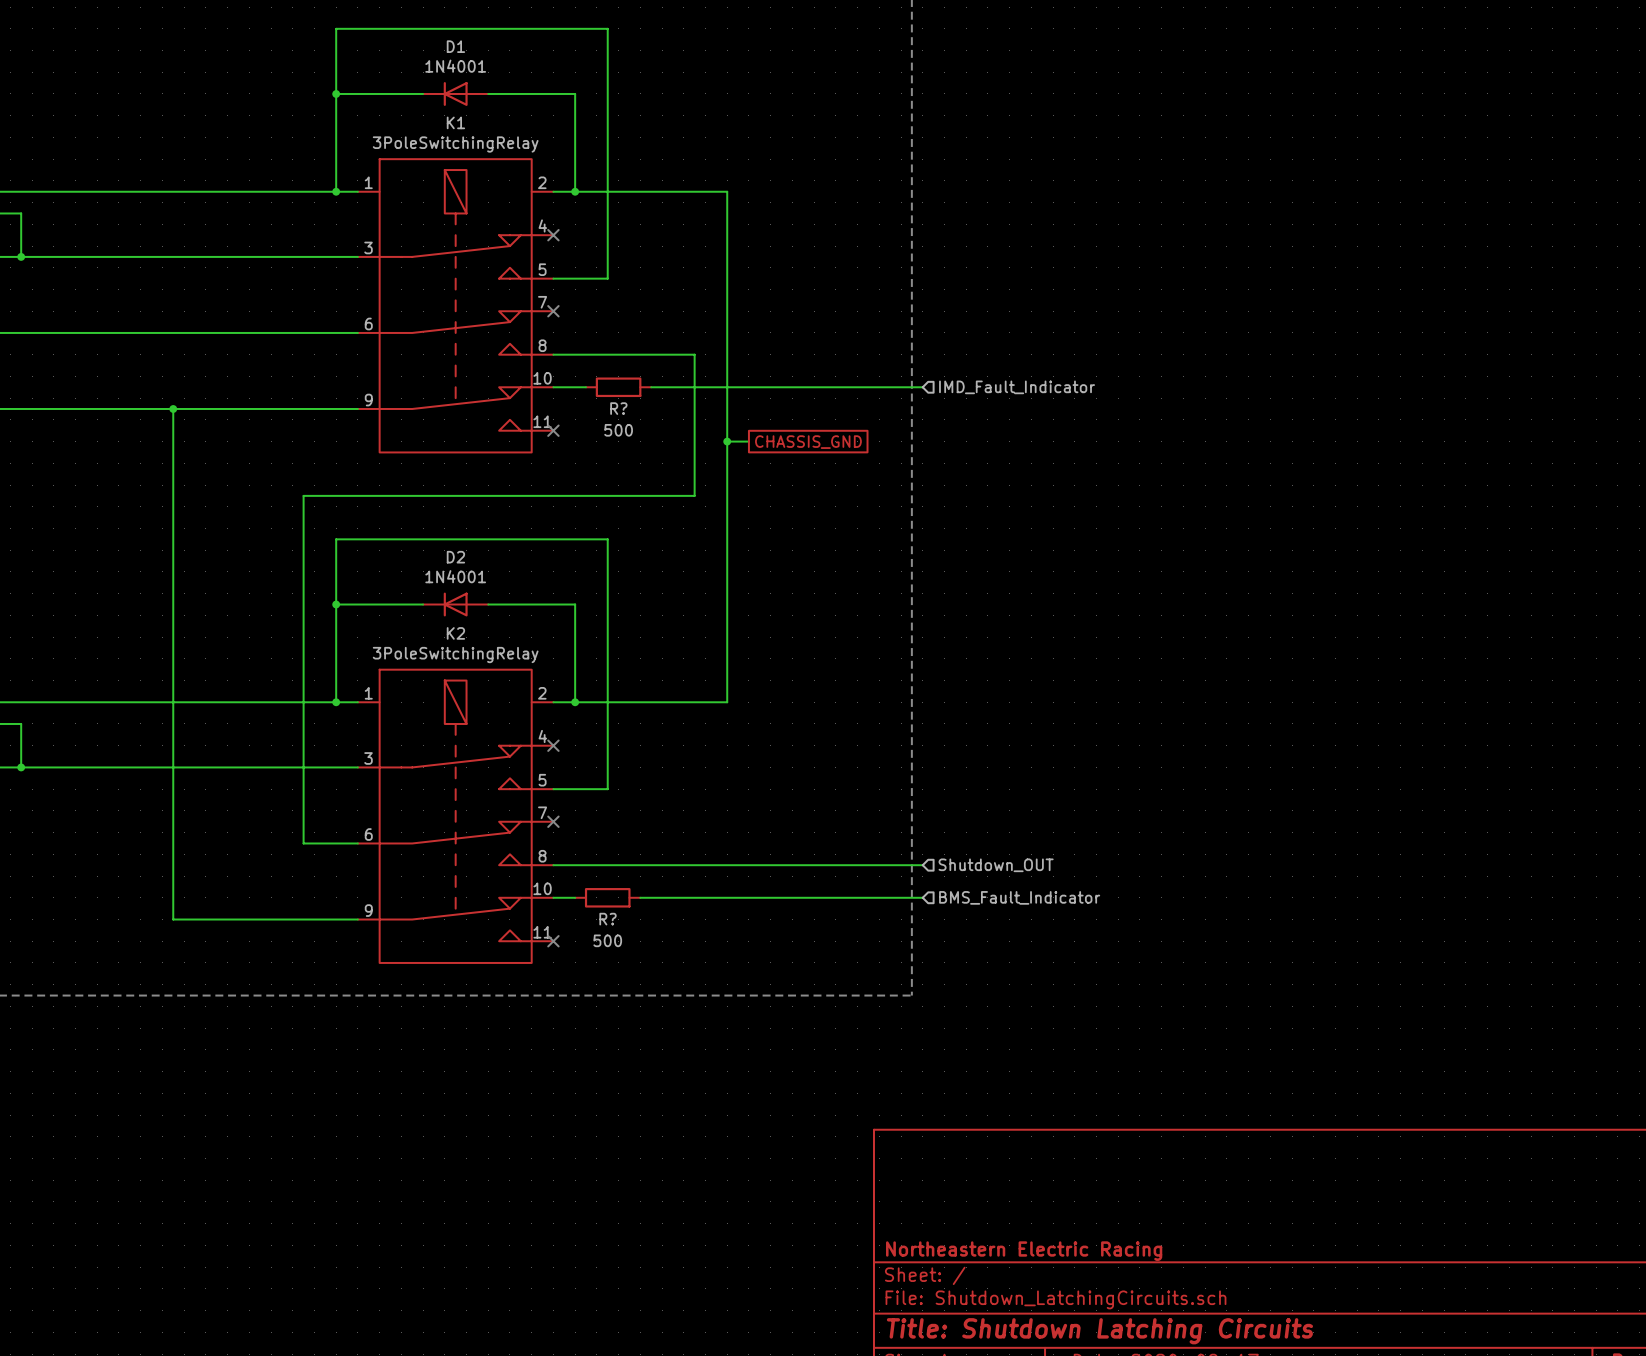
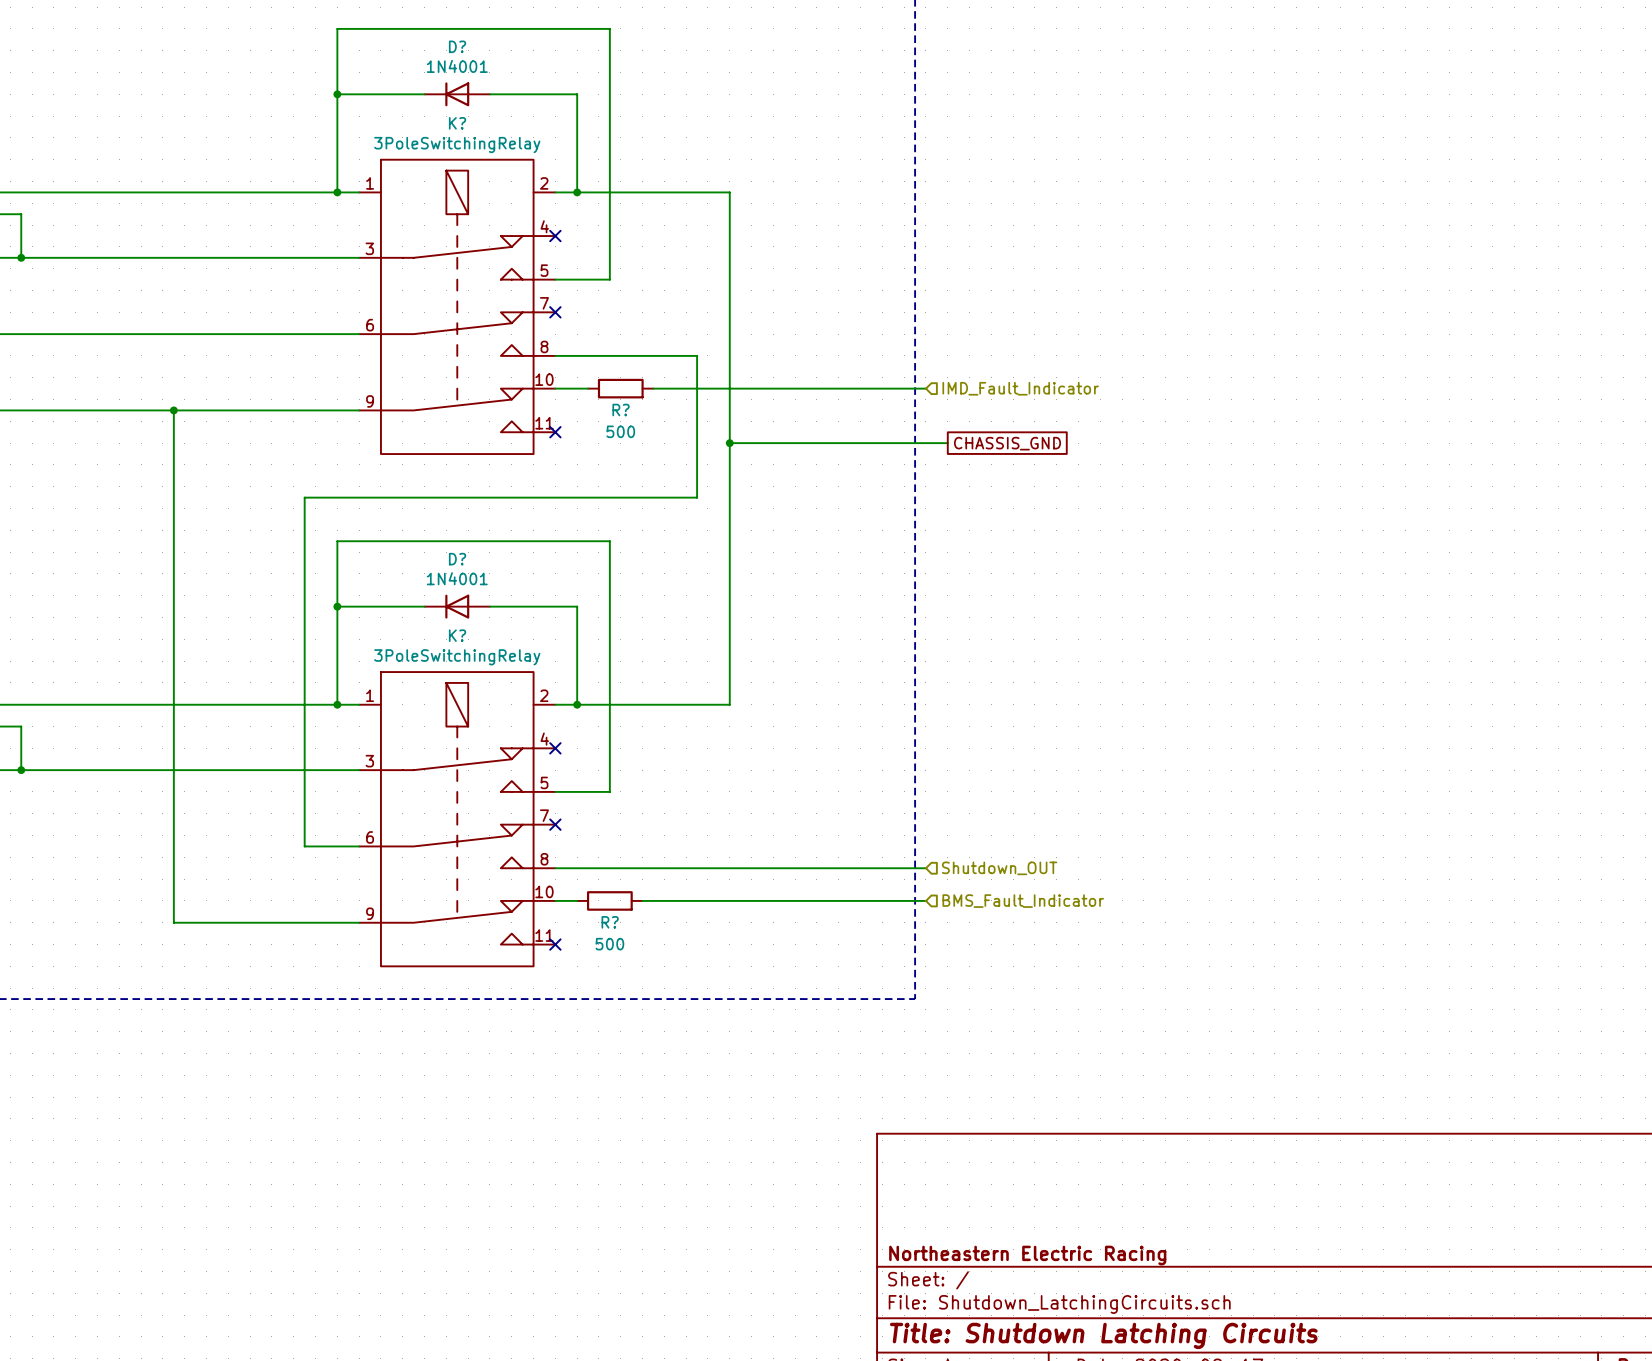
D1 name: D1 (455, 46) -> D? (457, 46)
K1 name: K1 (455, 122) -> K? (457, 123)
wire: none -> (751, 443) (947, 443)
global label position: CHASSIS_GND (808, 442) -> CHASSIS_GND (1007, 443)
D2 name: D2 (455, 557) -> D? (457, 559)
K2 name: K2 (455, 633) -> K? (457, 635)

